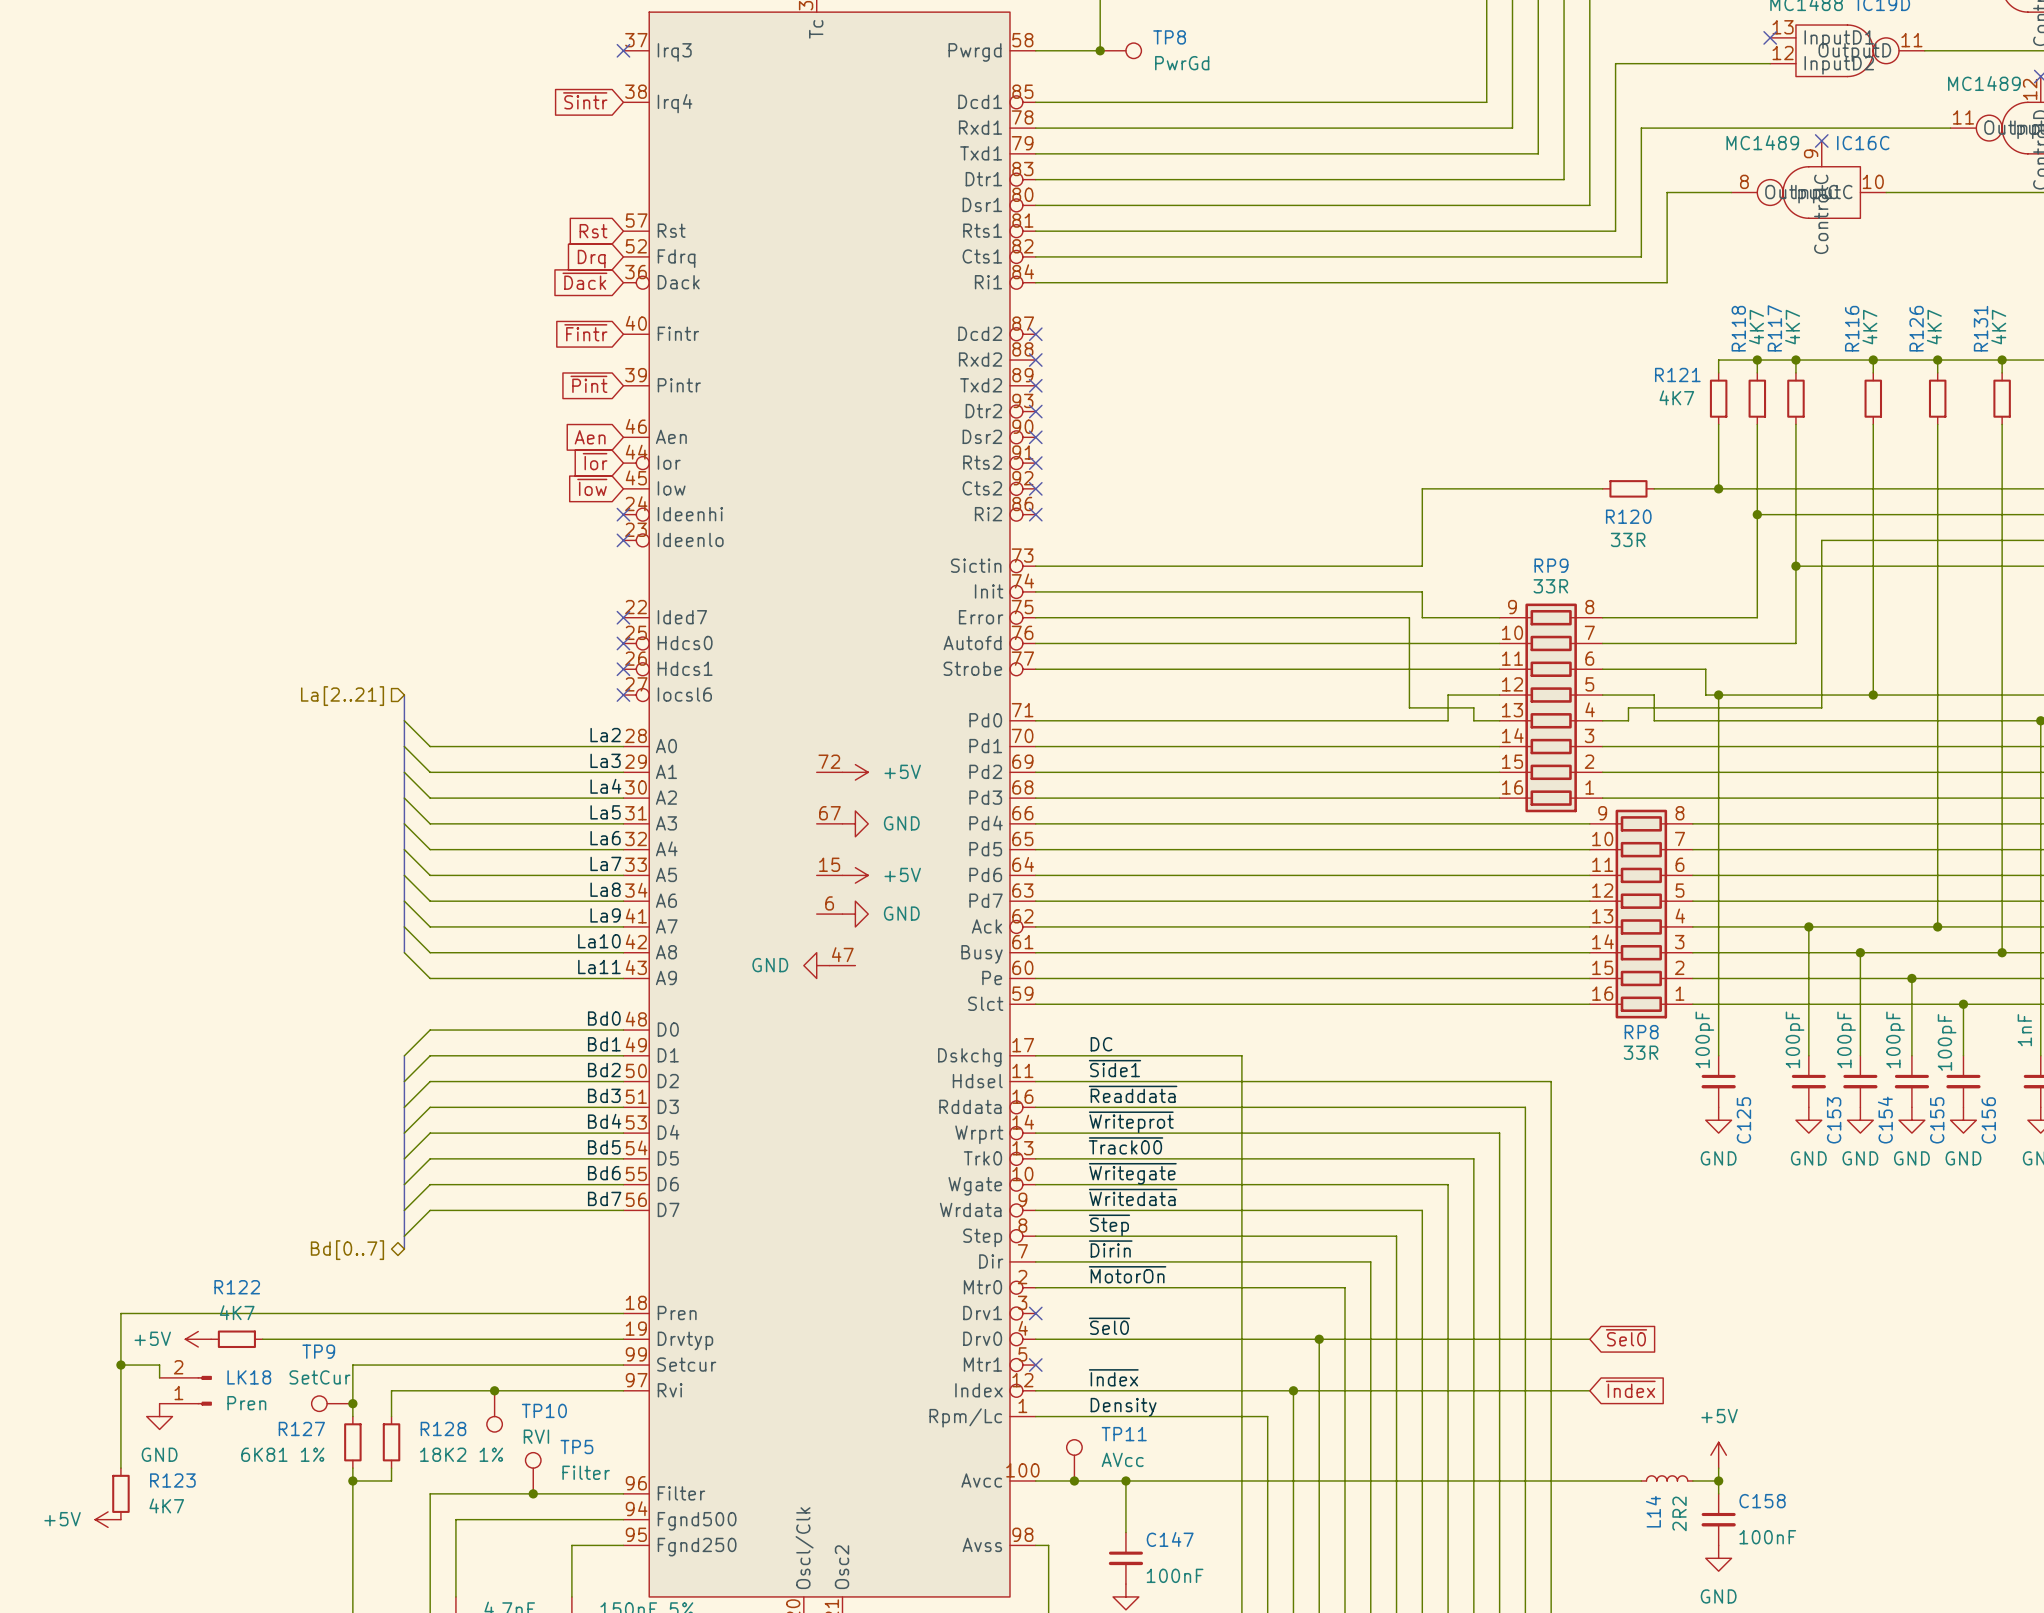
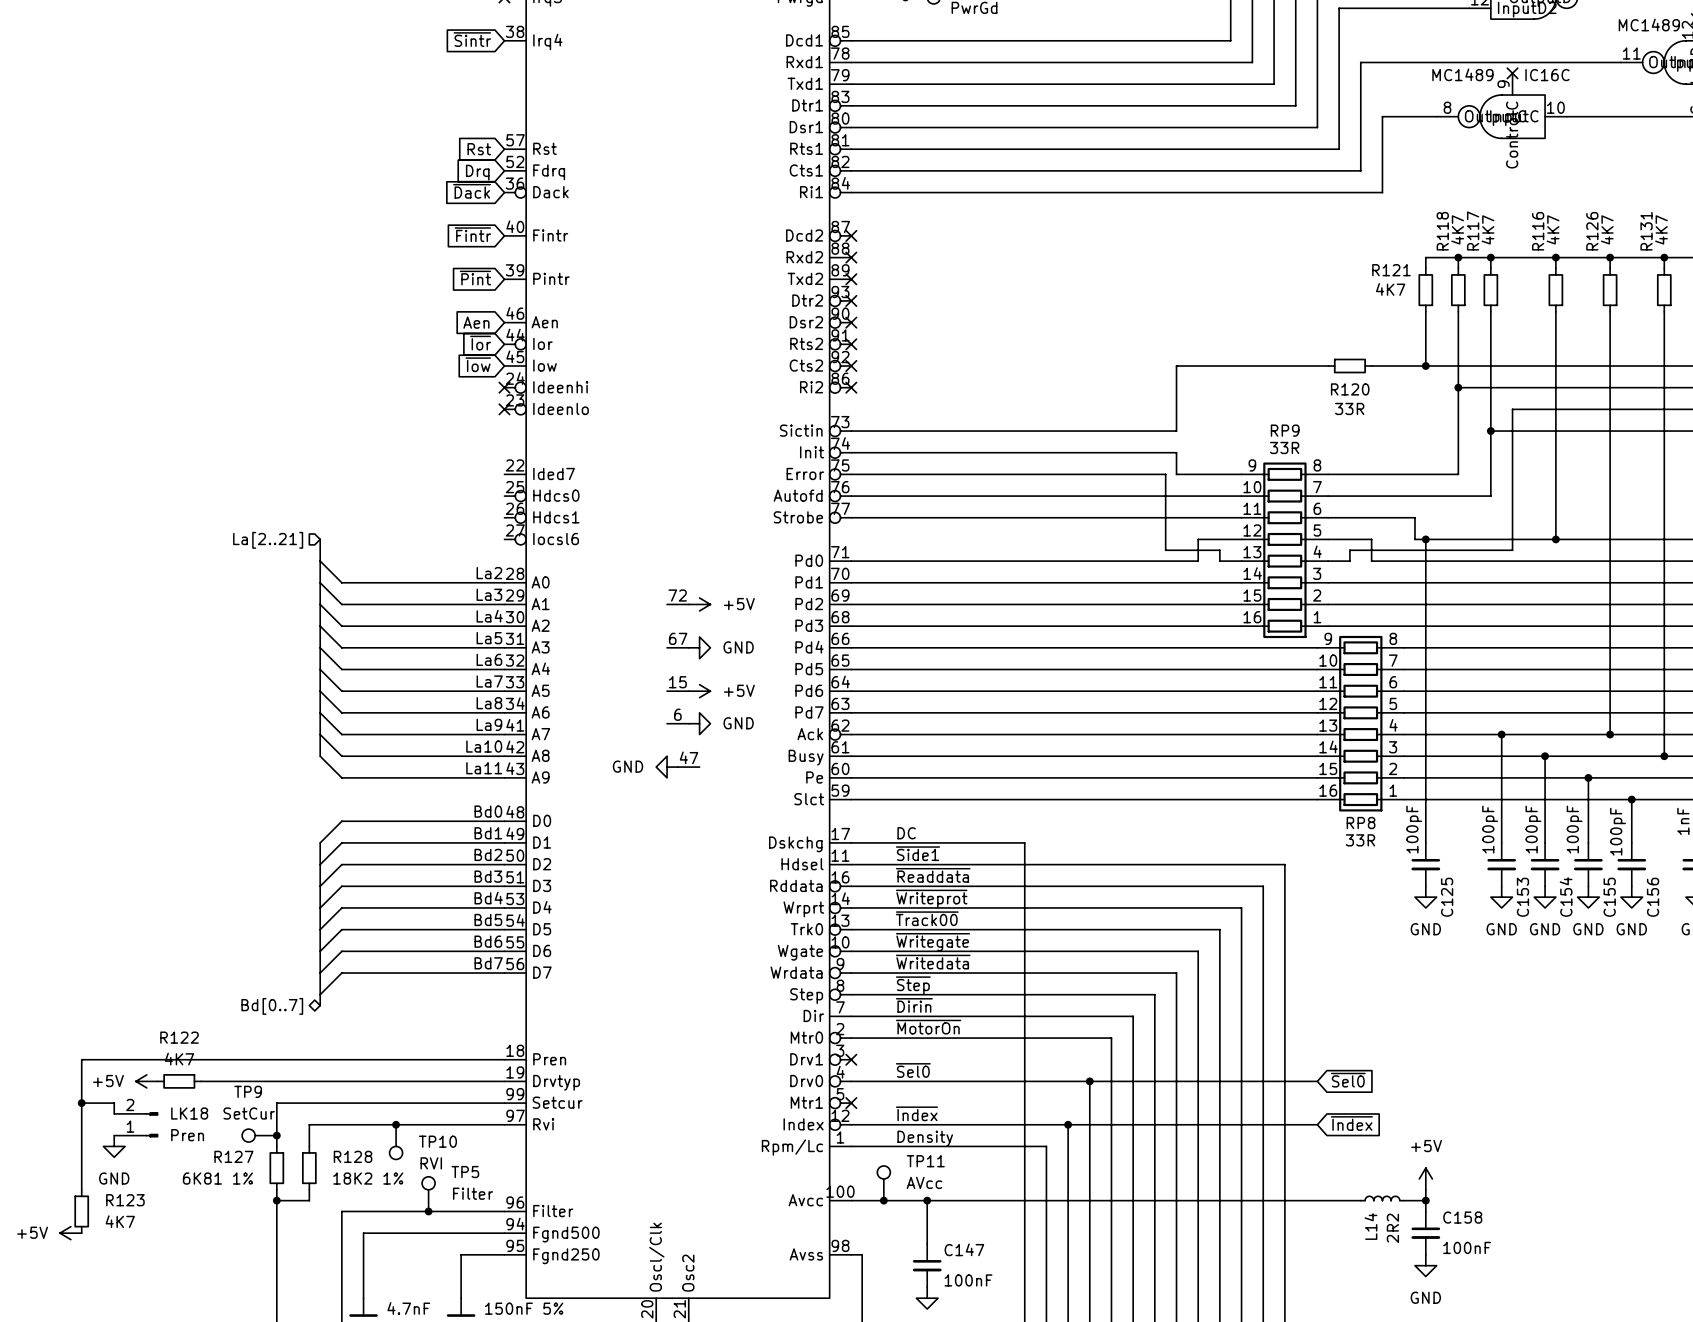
no-connect mark: (623, 617) -> none
no-connect mark: (623, 643) -> none
no-connect mark: (623, 669) -> none
no-connect mark: (623, 695) -> none

